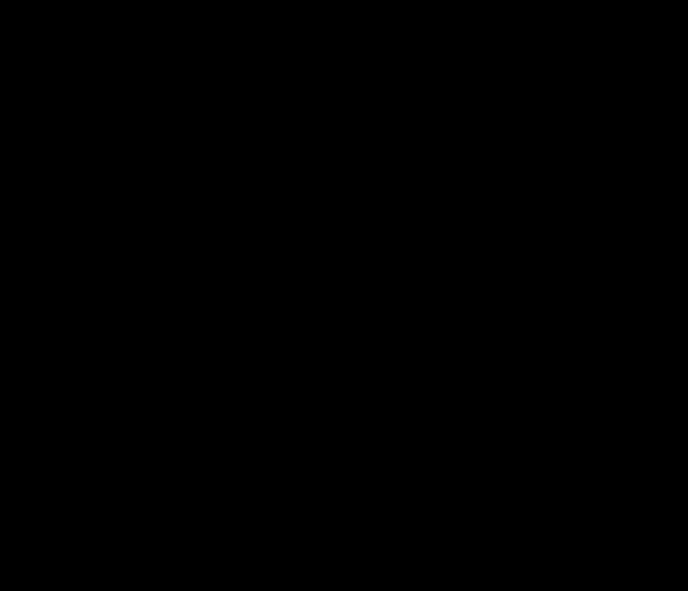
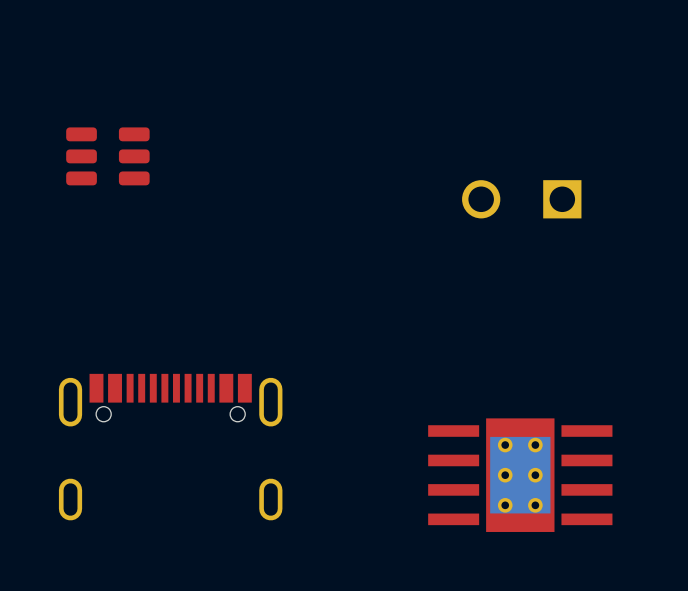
part: none -> (107, 156)
part: none -> (521, 199)
part: none -> (170, 447)
part: none -> (520, 475)

